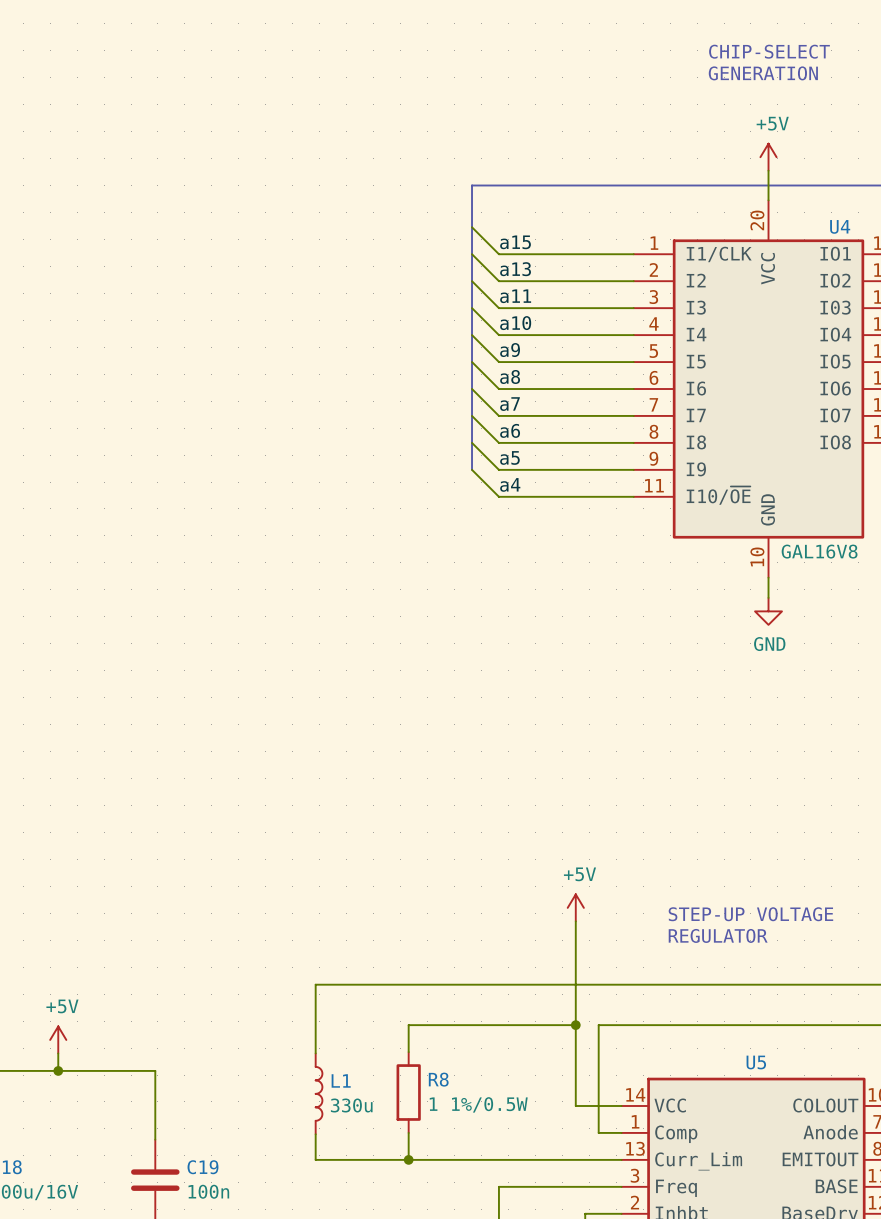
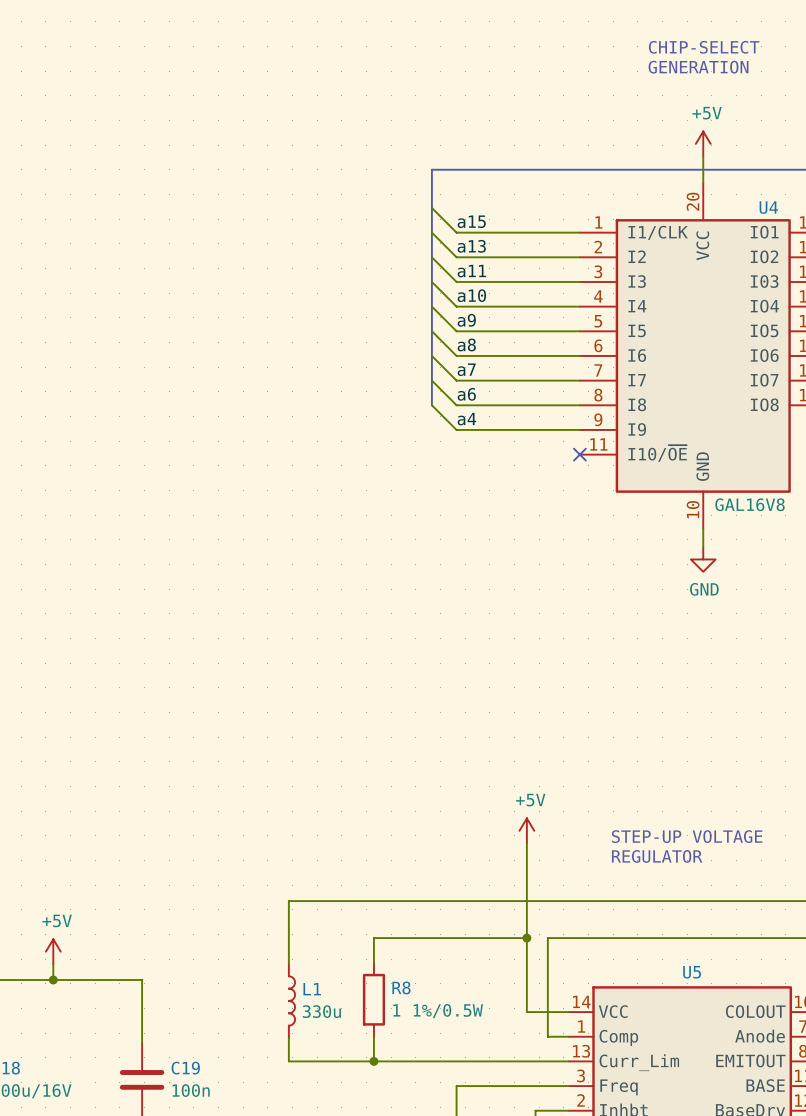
bus: (472, 442) (472, 469) -> none
label: a5 (509, 457) -> a4 (466, 419)
wire: (472, 469) (498, 496) (633, 496) -> none
label: a4 (510, 484) -> none
no-connect mark: none -> (579, 454)

